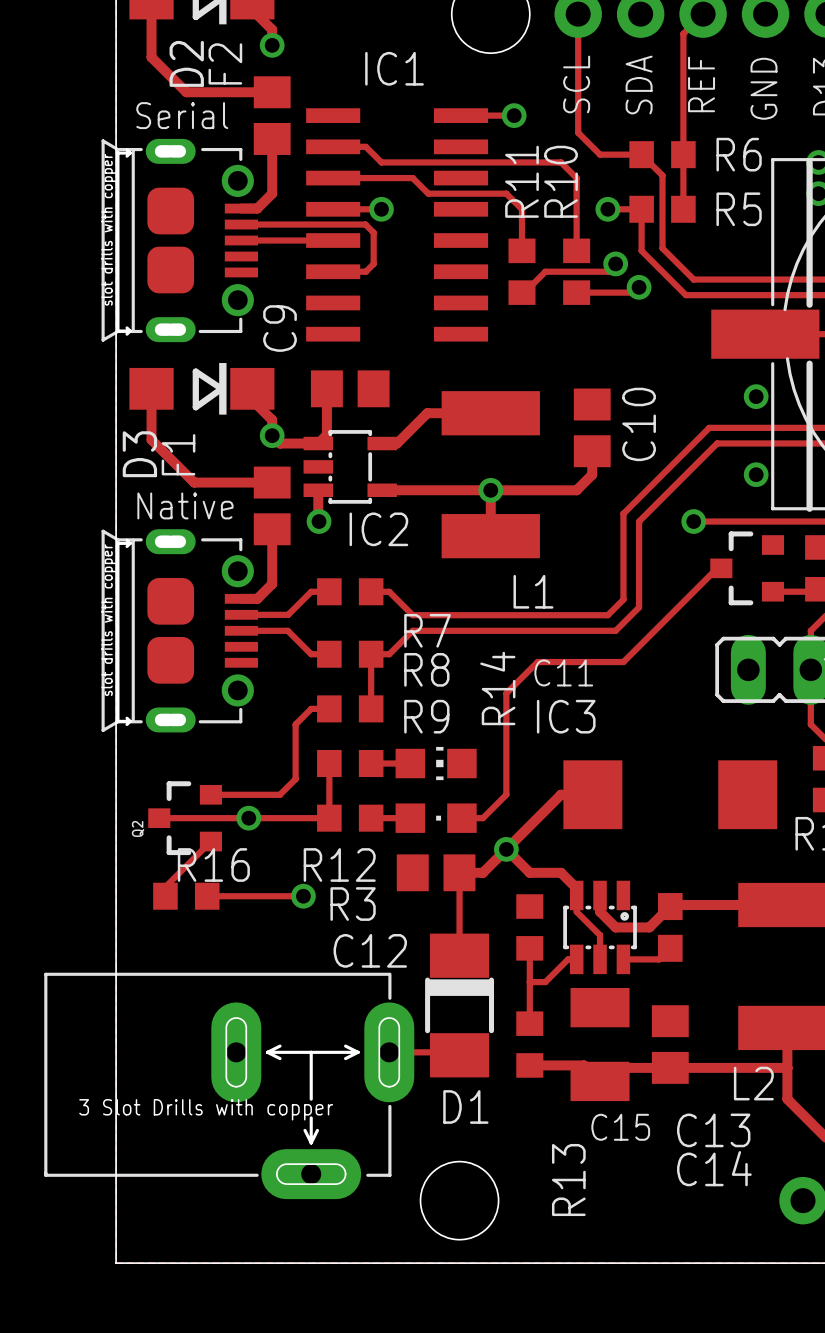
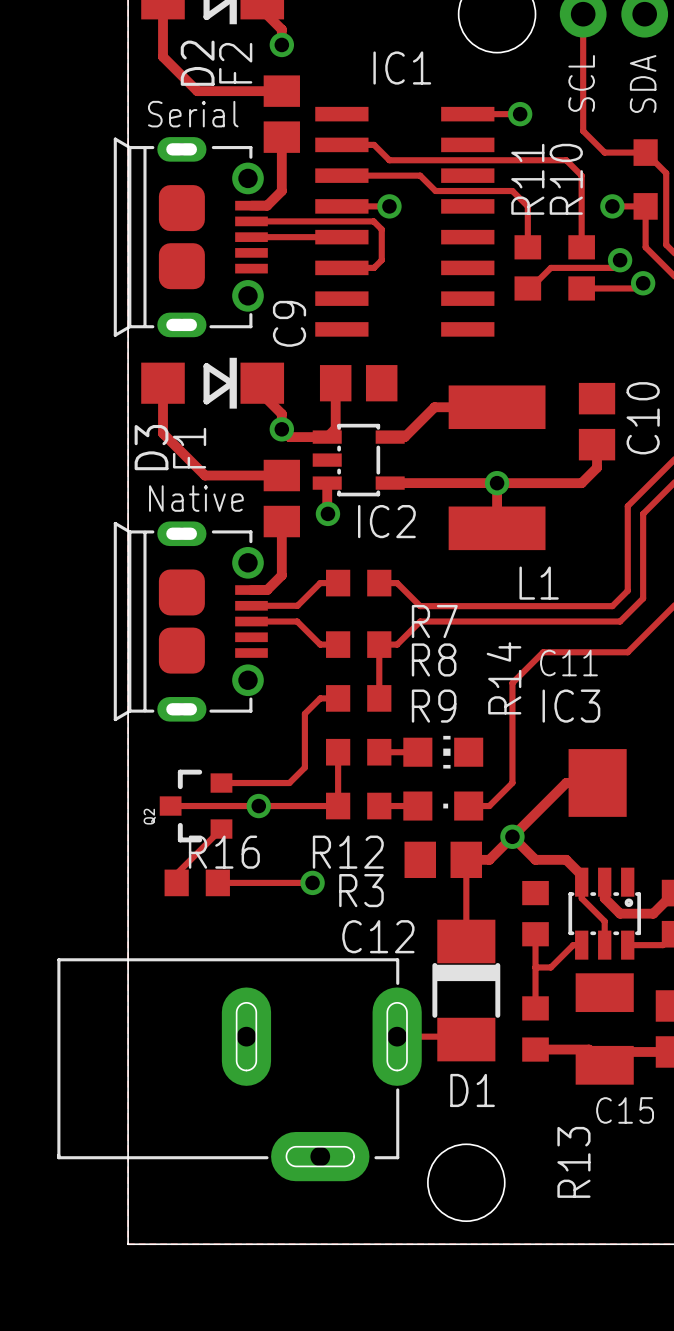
part footprint: [101, 138, 259, 343] -> [113, 137, 268, 338]
part footprint: [101, 529, 259, 733] -> [113, 521, 268, 722]
part footprint: [44, 972, 415, 1200] -> [57, 958, 422, 1182]

